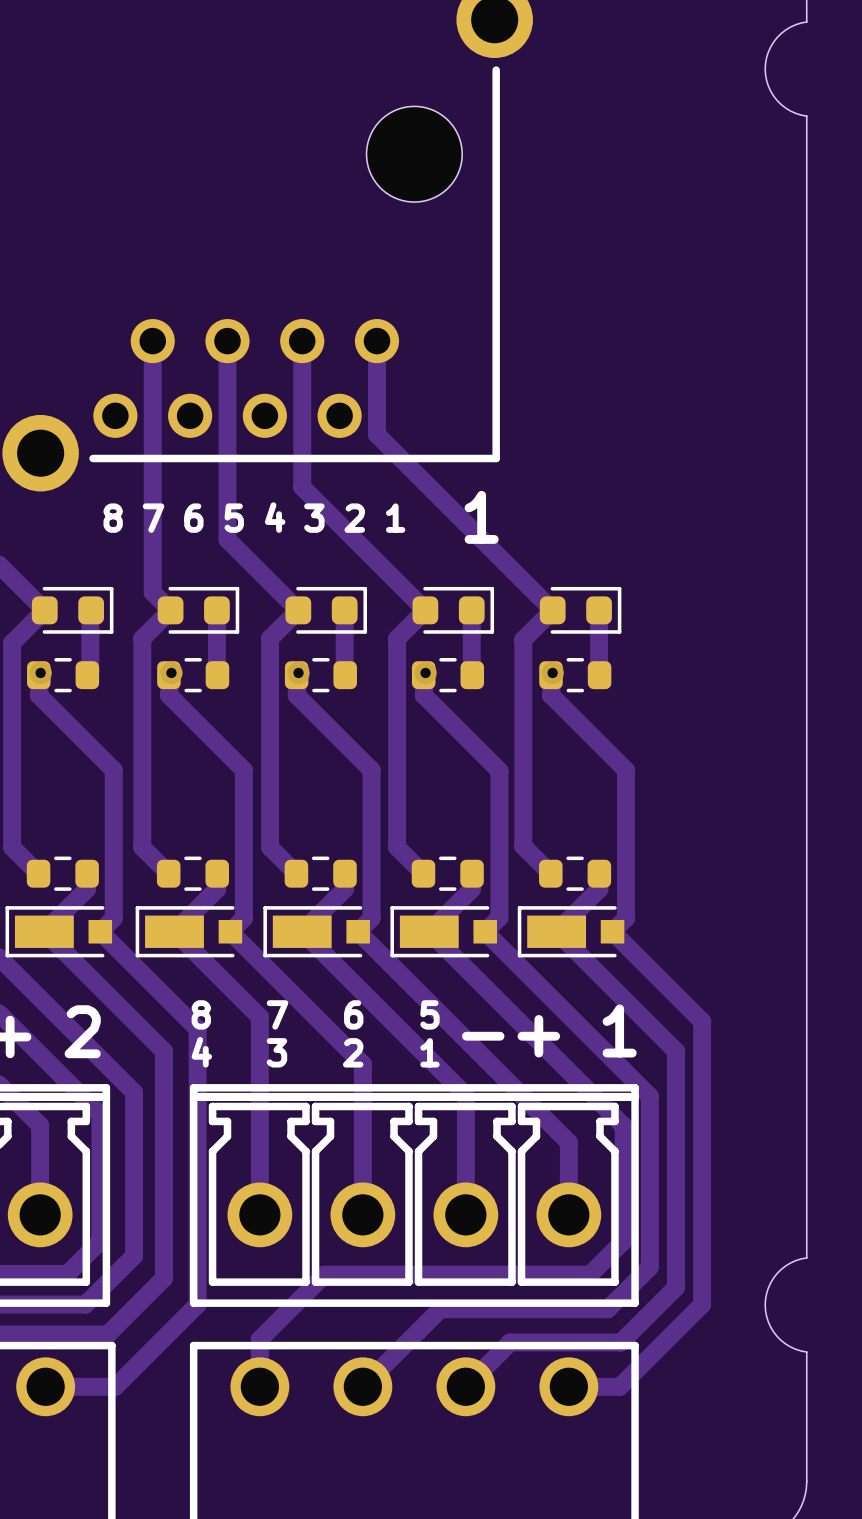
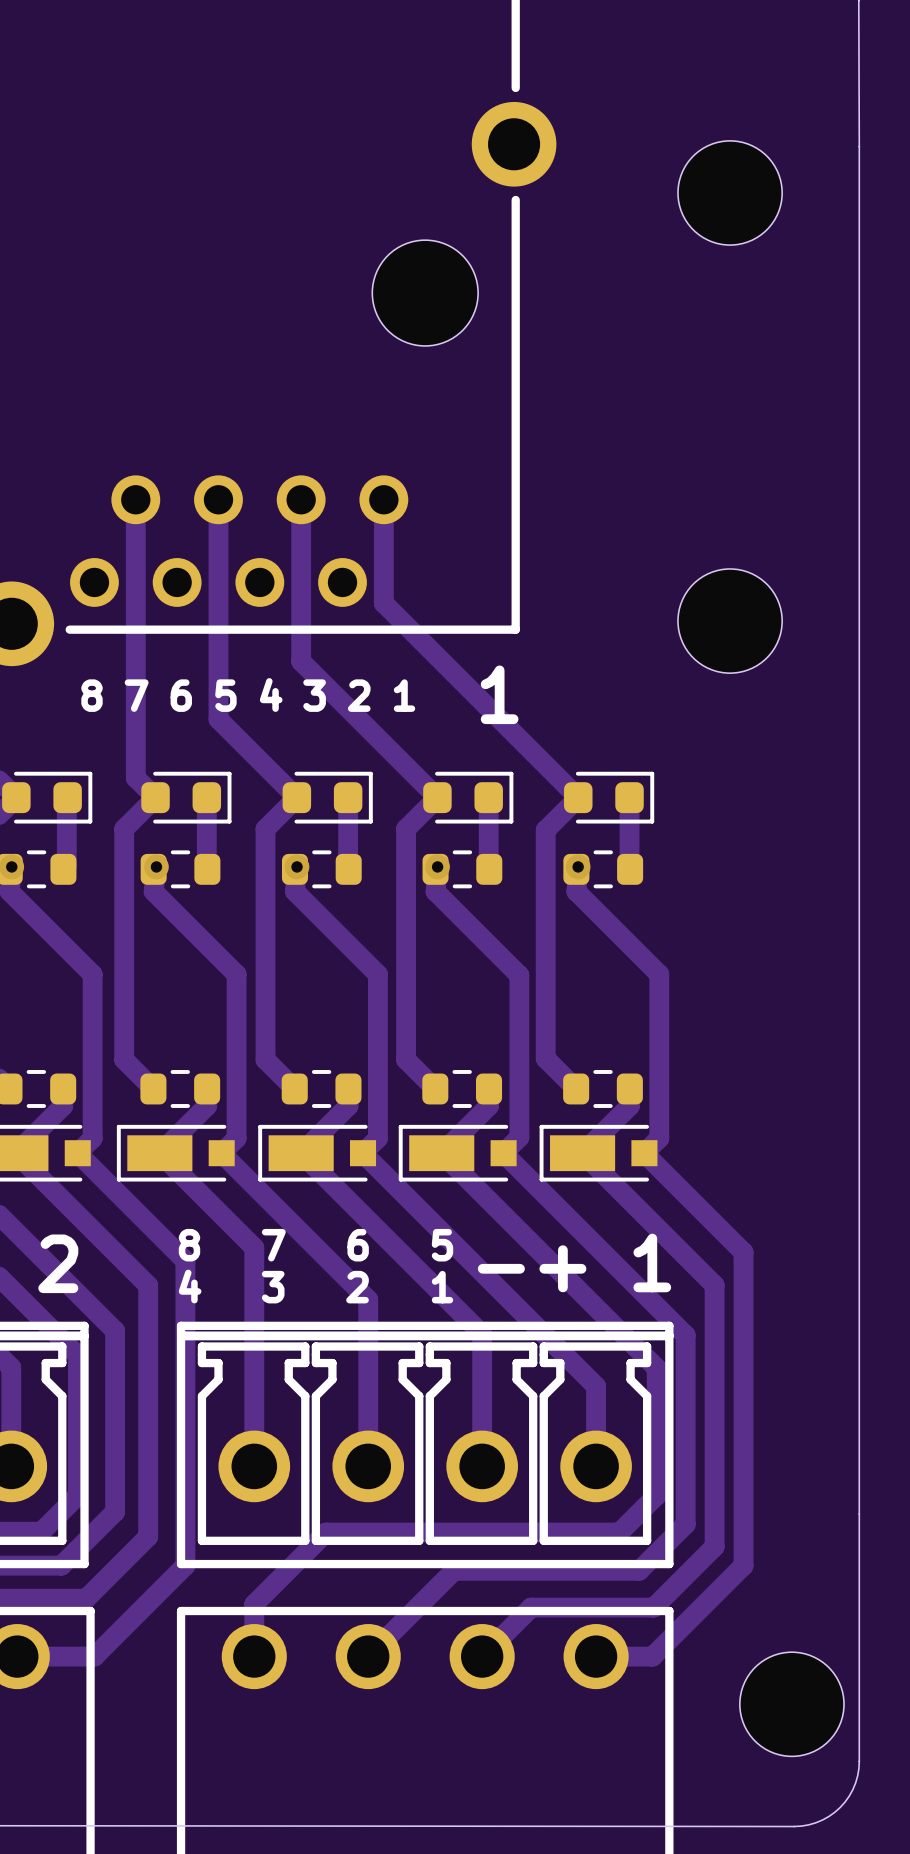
board edge: (806, 21) (790, 27) (777, 37) (768, 52) (765, 69) (768, 85) (777, 100) (790, 111) (806, 116) -> (859, 146) (859, 250)
part: none -> (730, 192)
part: none -> (730, 621)
board edge: (806, 1257) (790, 1263) (777, 1273) (768, 1288) (765, 1304) (768, 1321) (777, 1336) (790, 1346) (806, 1352) -> (859, 1514) (859, 1618)
part: none -> (791, 1704)

